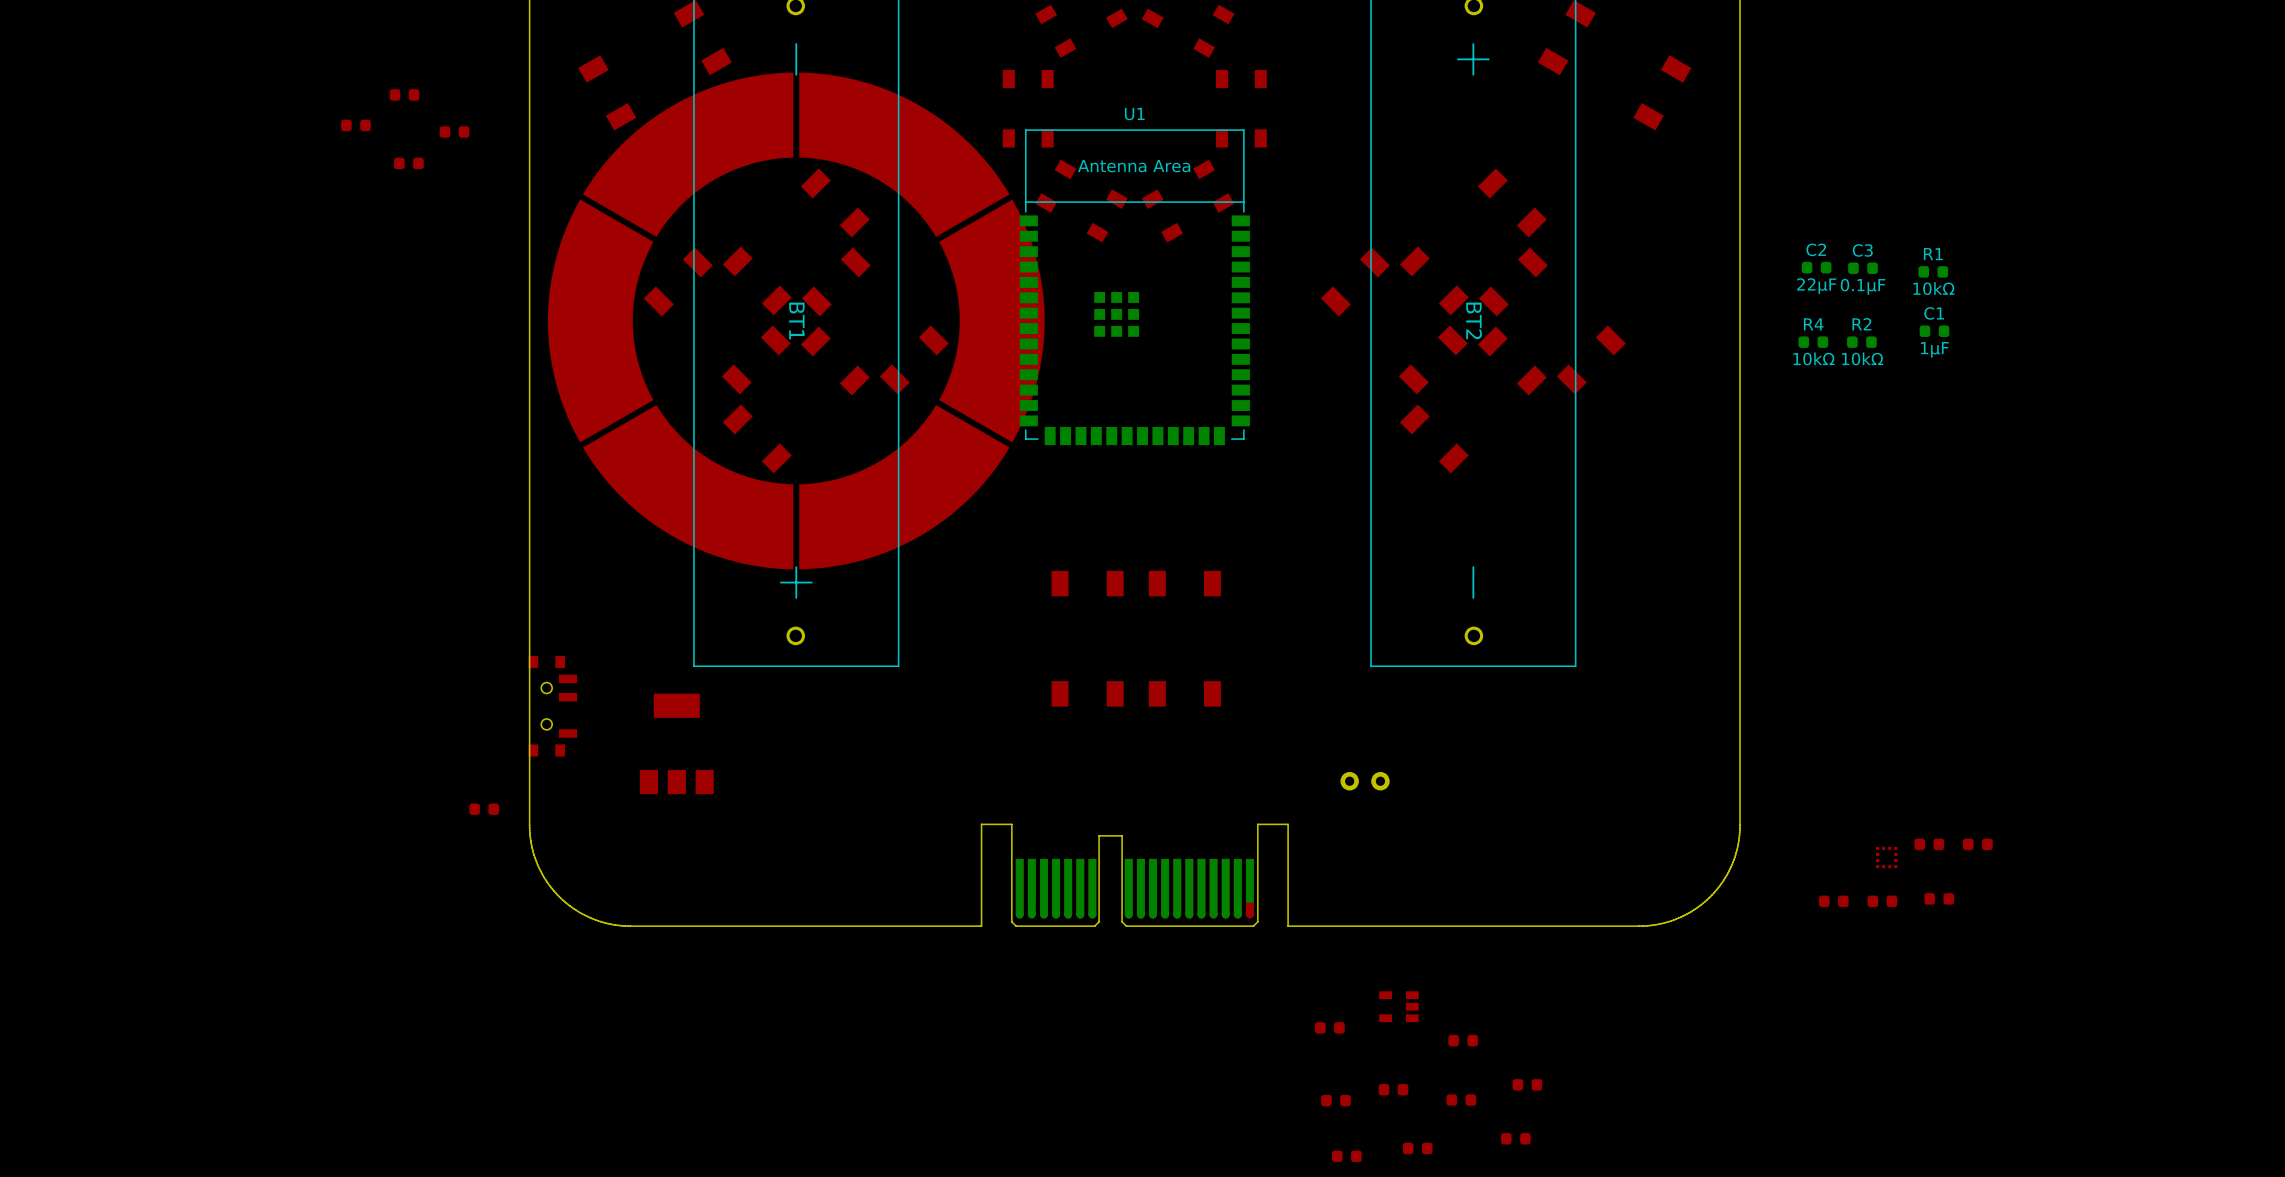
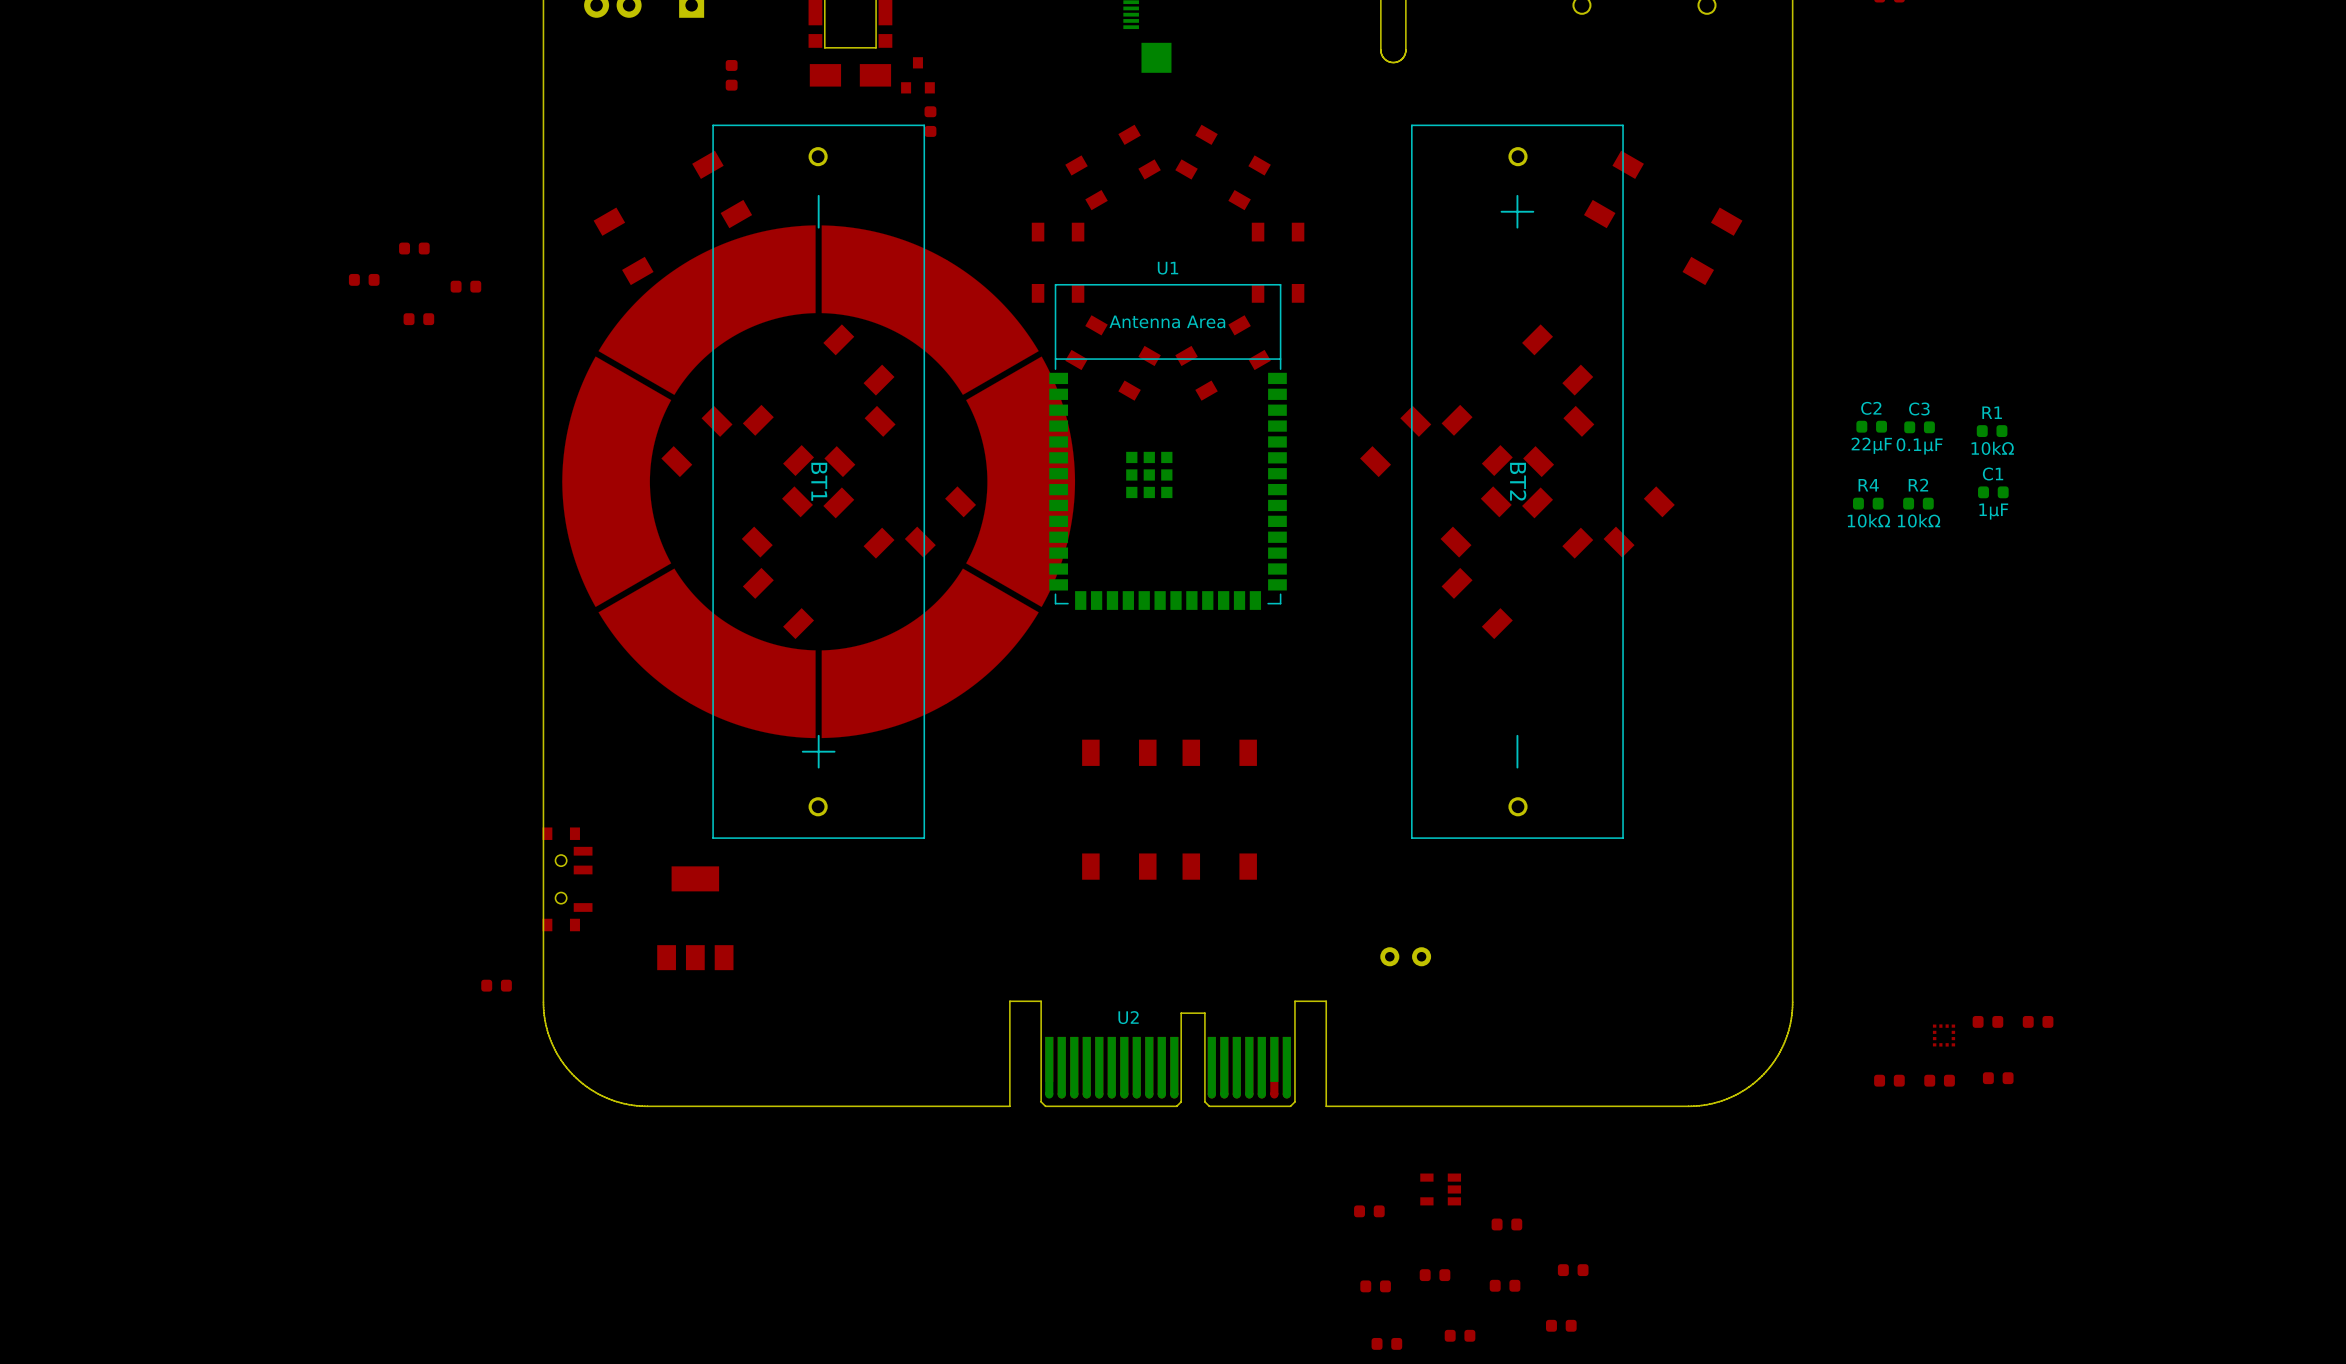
U2 side: top (1134, 888) -> bottom (1168, 1067)
board edge: (1126, 926) (1122, 921) (1122, 835) (1099, 835) (1099, 921) (1094, 926) -> (1159, 1106) (1126, 1106)
board edge: (1174, 926) (1143, 926) -> (1209, 1106) (1204, 1101) (1204, 1013) (1181, 1013) (1181, 1101) (1176, 1106)

